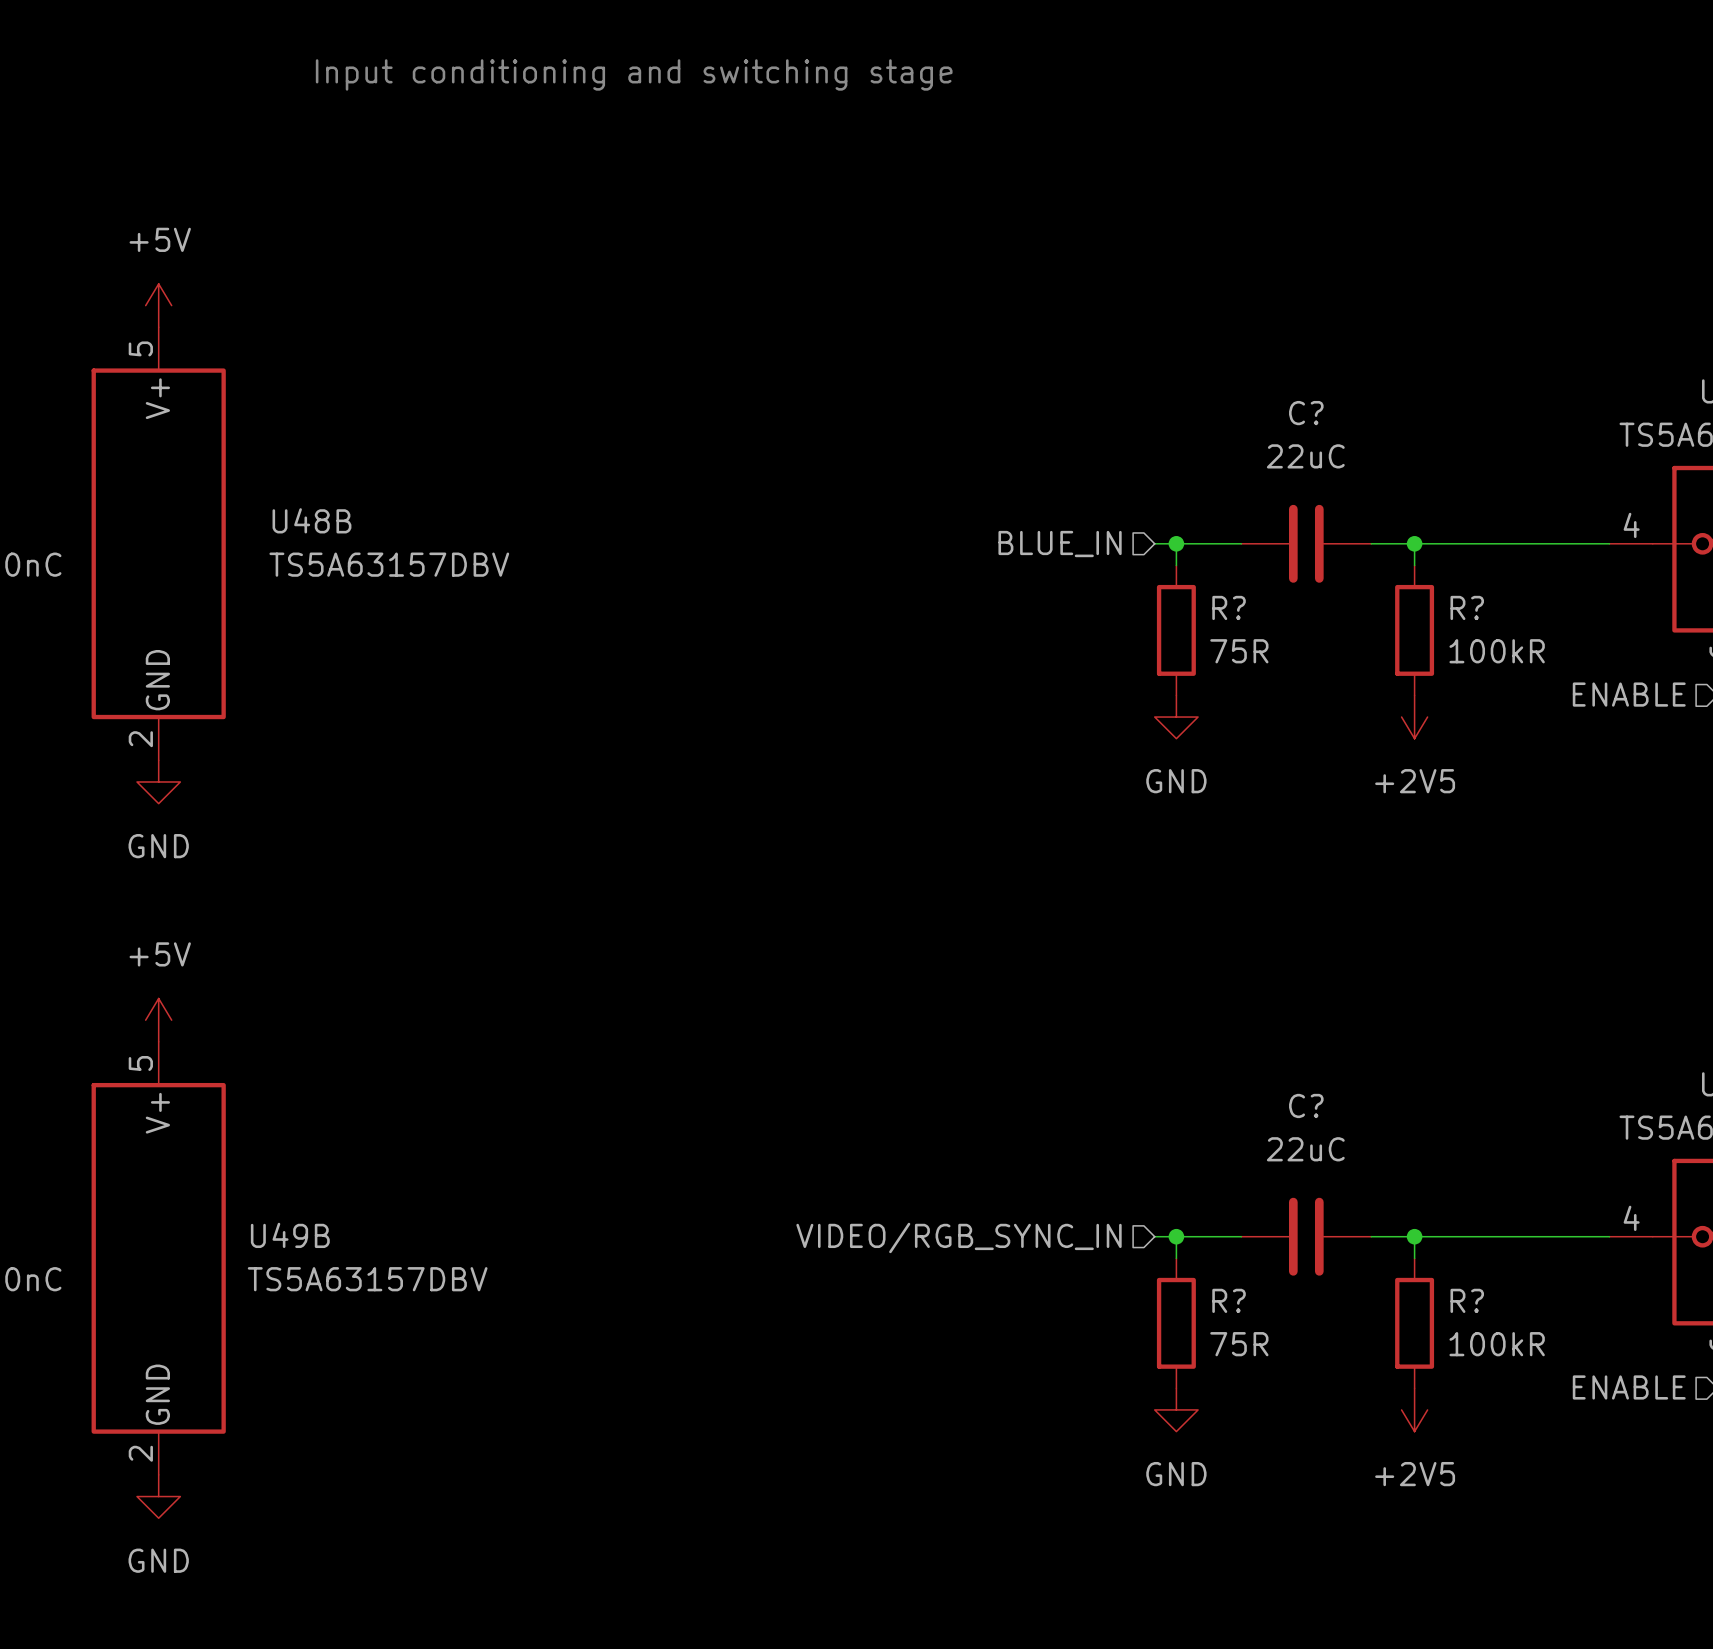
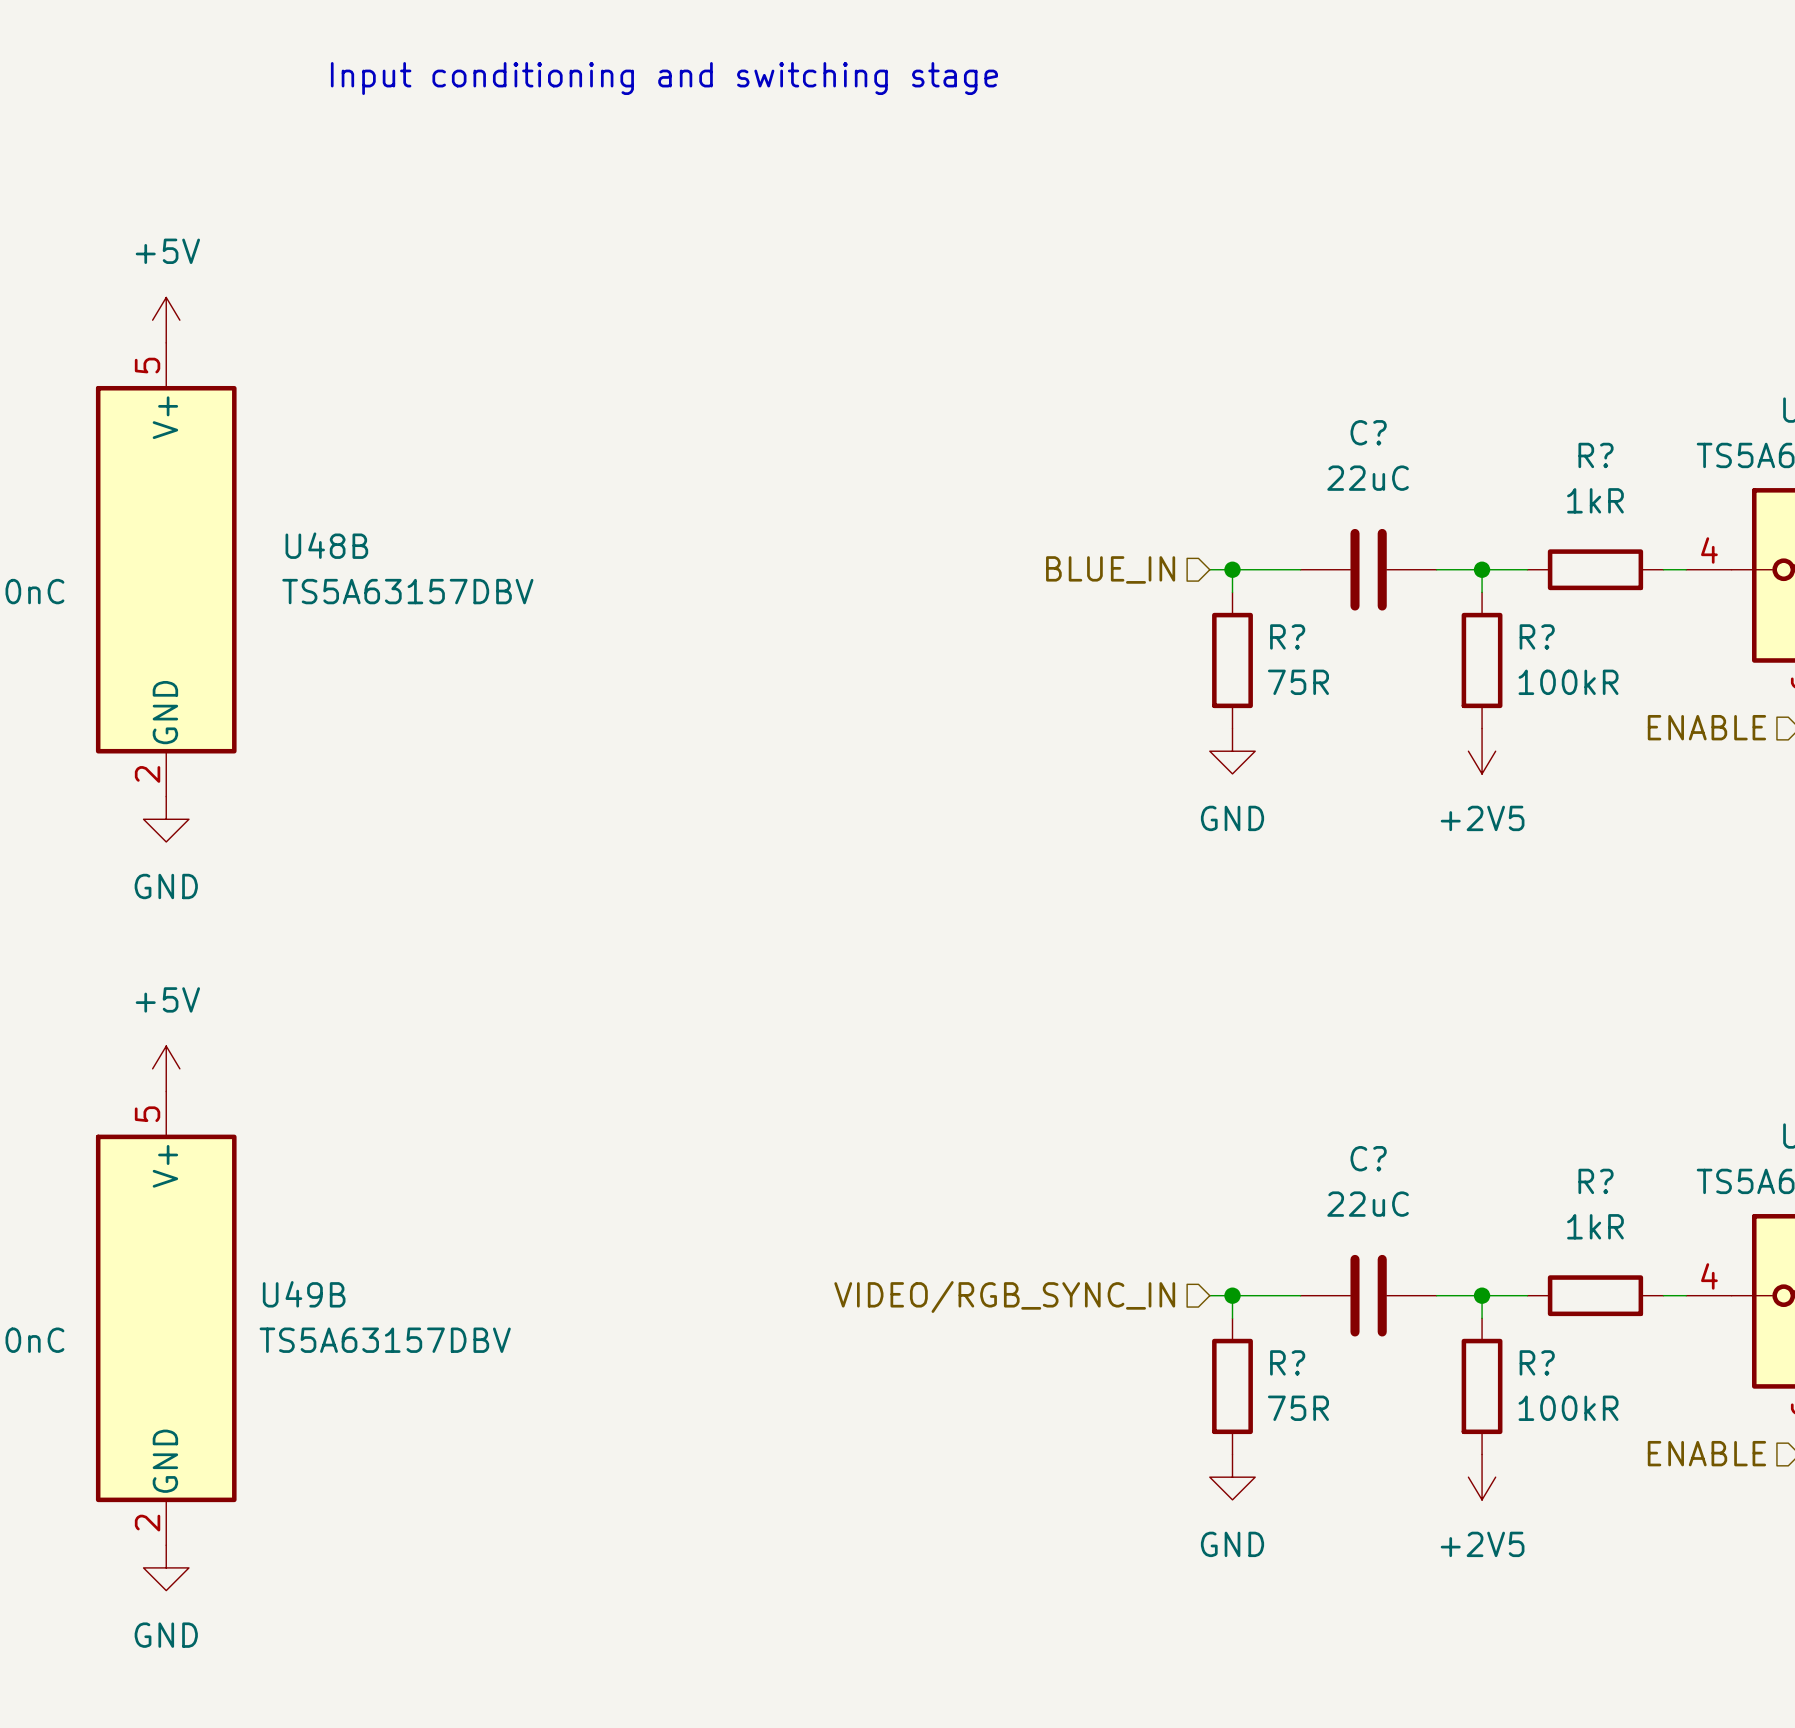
wire: (1457, 543) (1587, 543) -> none
R?: none -> 1kR (1595, 569)
wire: (1457, 1236) (1587, 1236) -> none
R?: none -> 1kR (1595, 1295)

